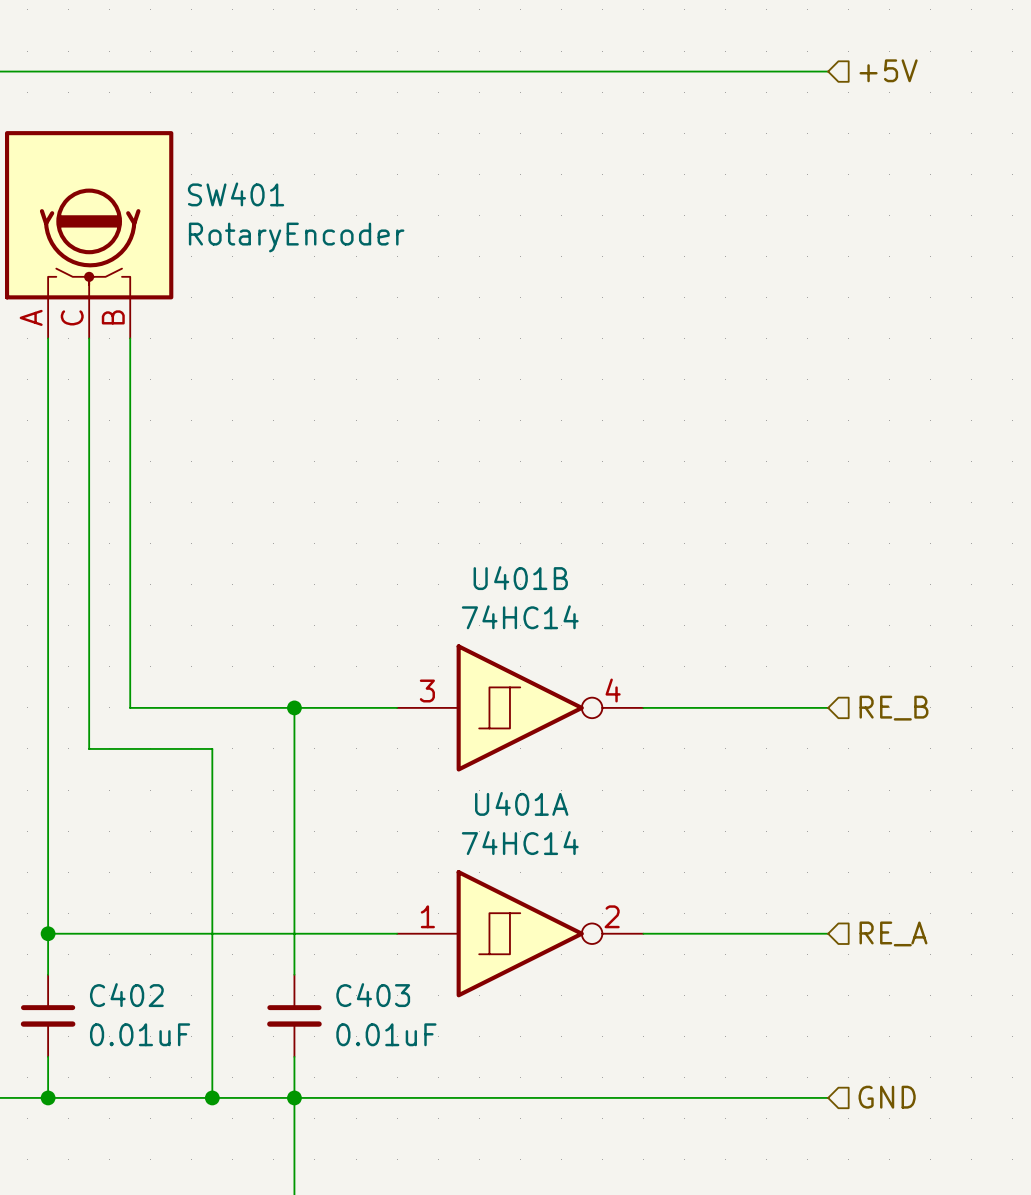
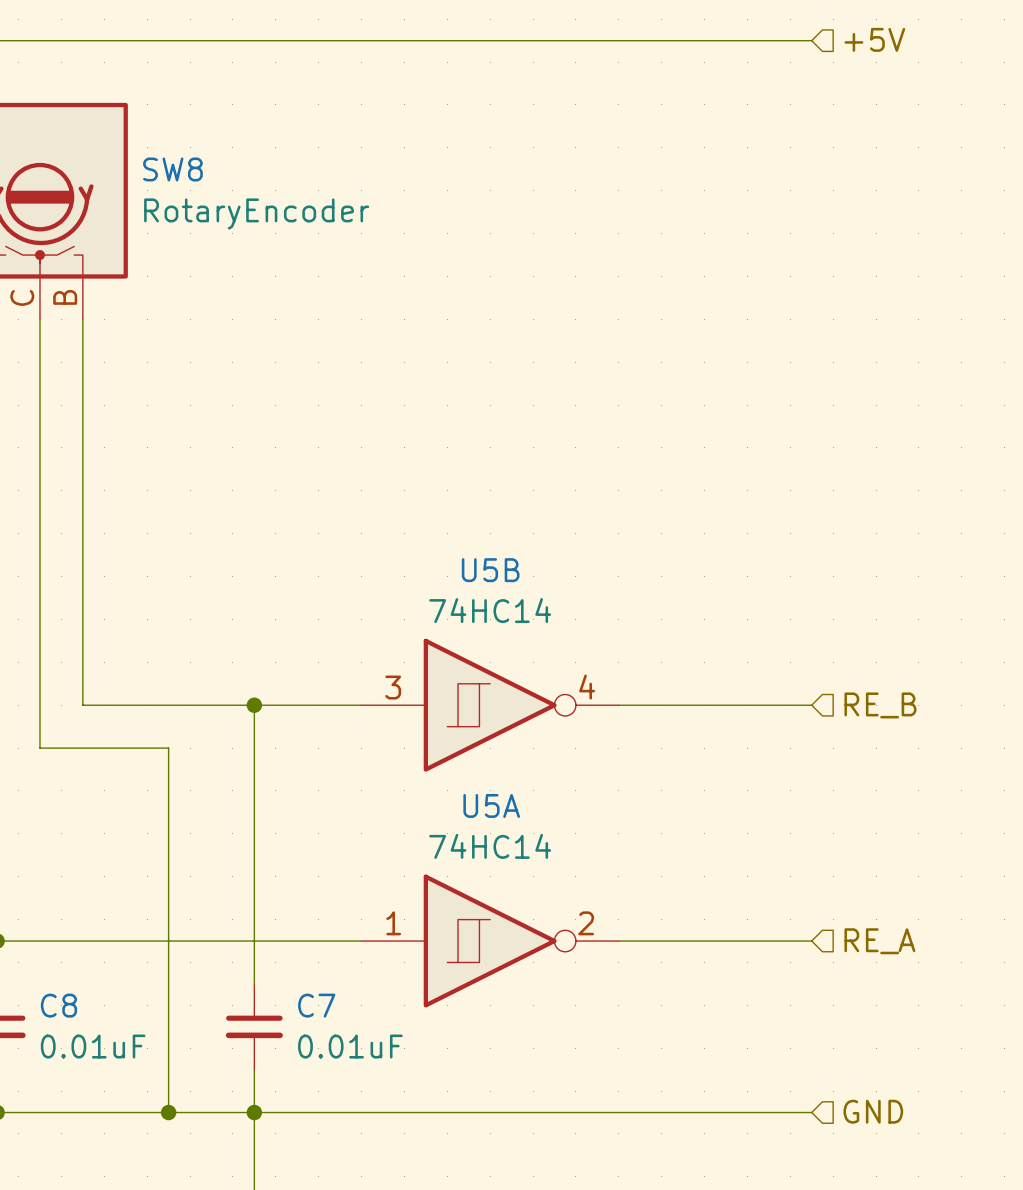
SW401 name: SW401 (236, 194) -> SW8 (172, 169)
U401B name: U401B (520, 578) -> U5B (490, 570)
U401A name: U401A (521, 803) -> U5A (491, 805)
C402 name: C402 (126, 995) -> C8 (58, 1005)
C403 name: C403 (373, 995) -> C7 (316, 1005)

